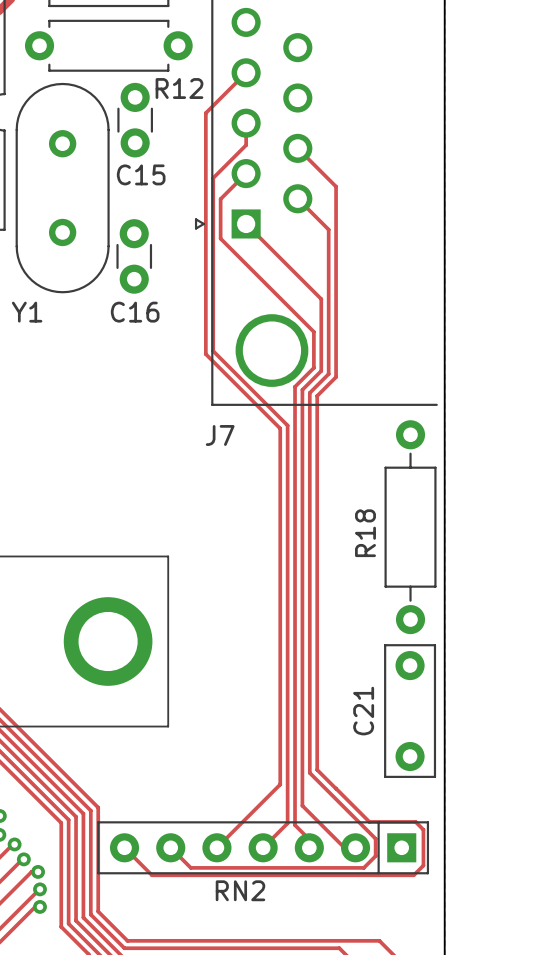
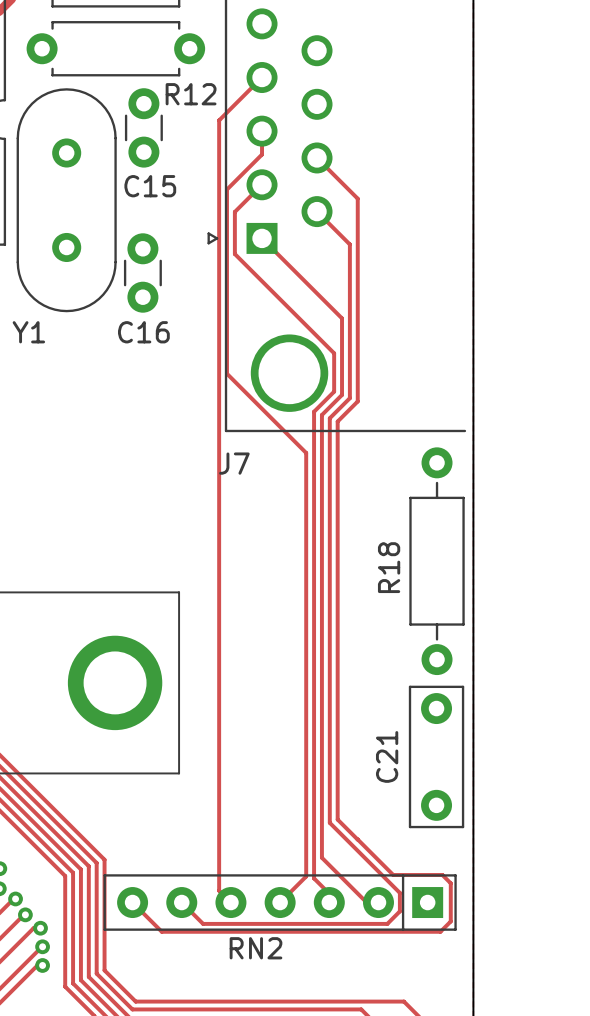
track: (205, 354) (280, 428) (280, 784) (216, 847) -> (219, 377) (219, 890) (230, 902)

